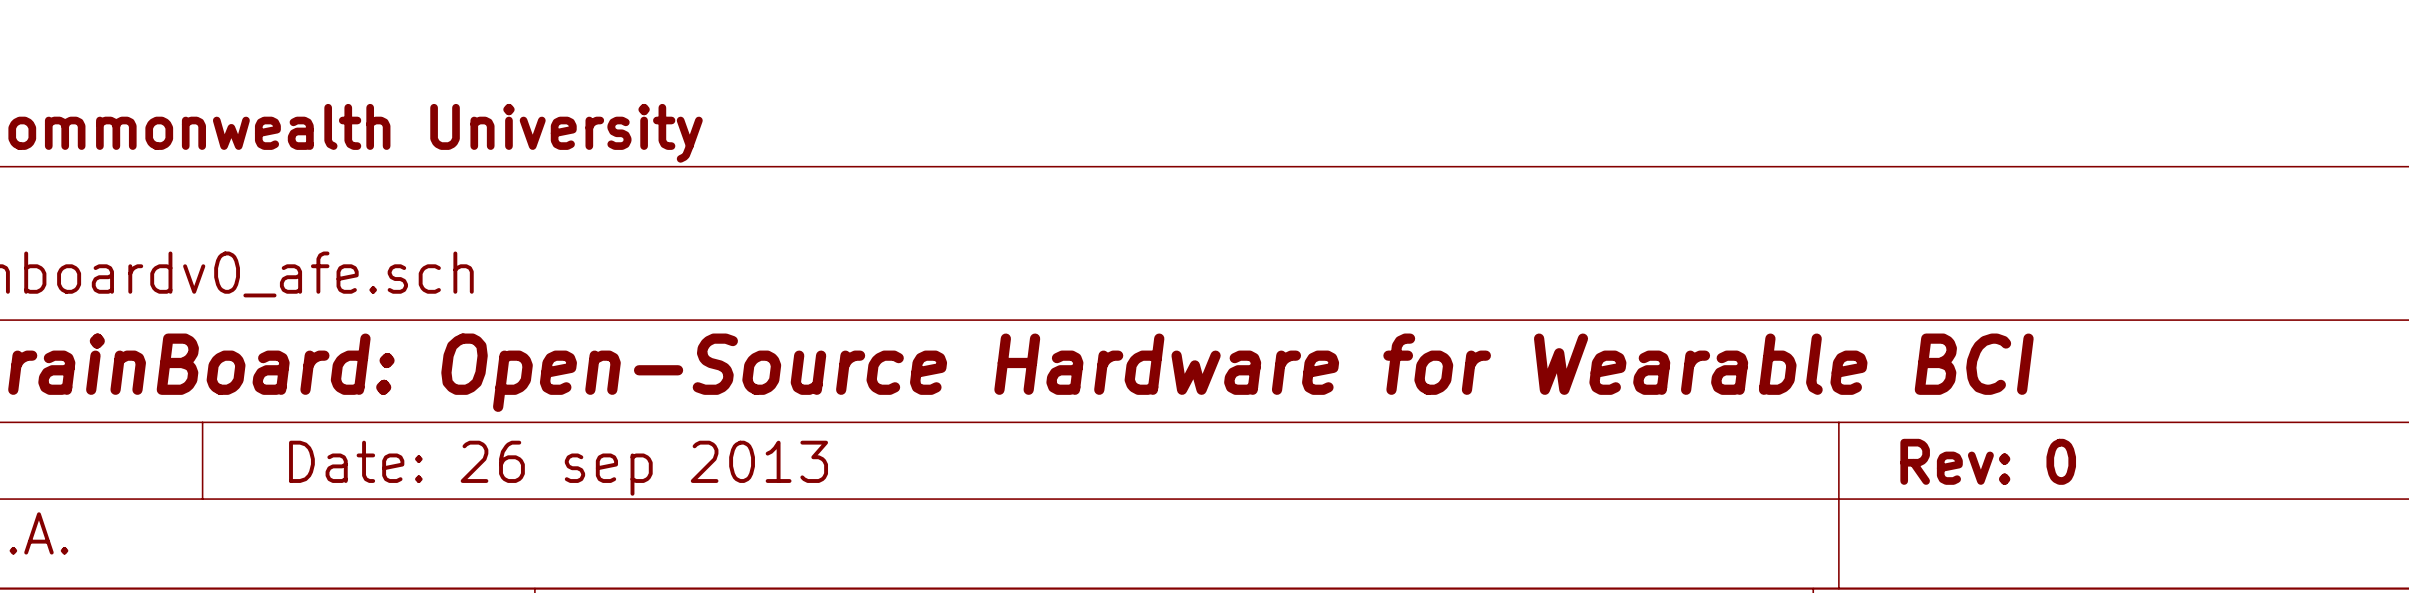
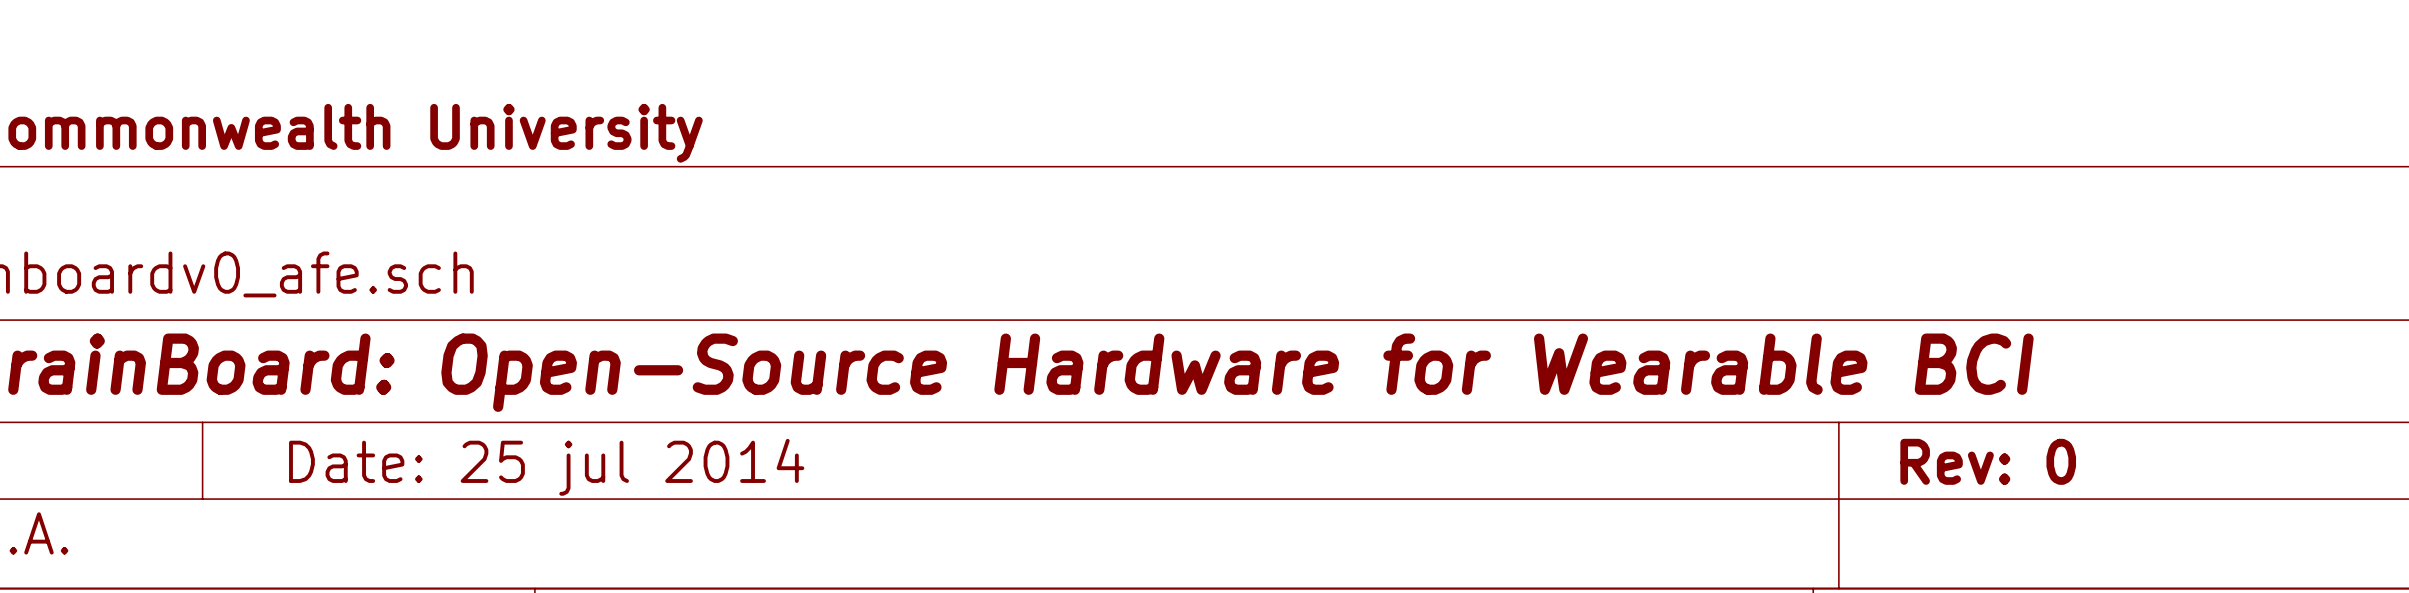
title block: Date: 26 sep 2013 (558, 468) -> Date: 25 jul 2014 (546, 467)

